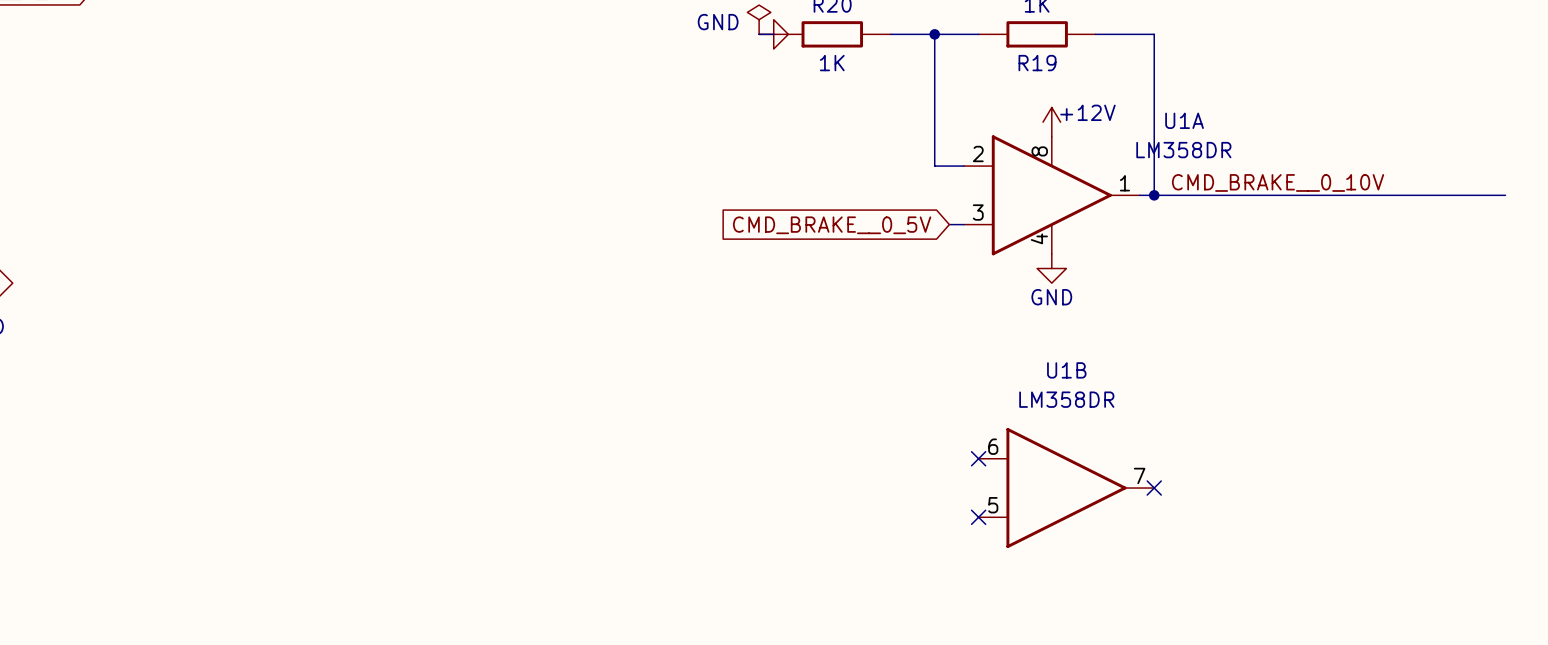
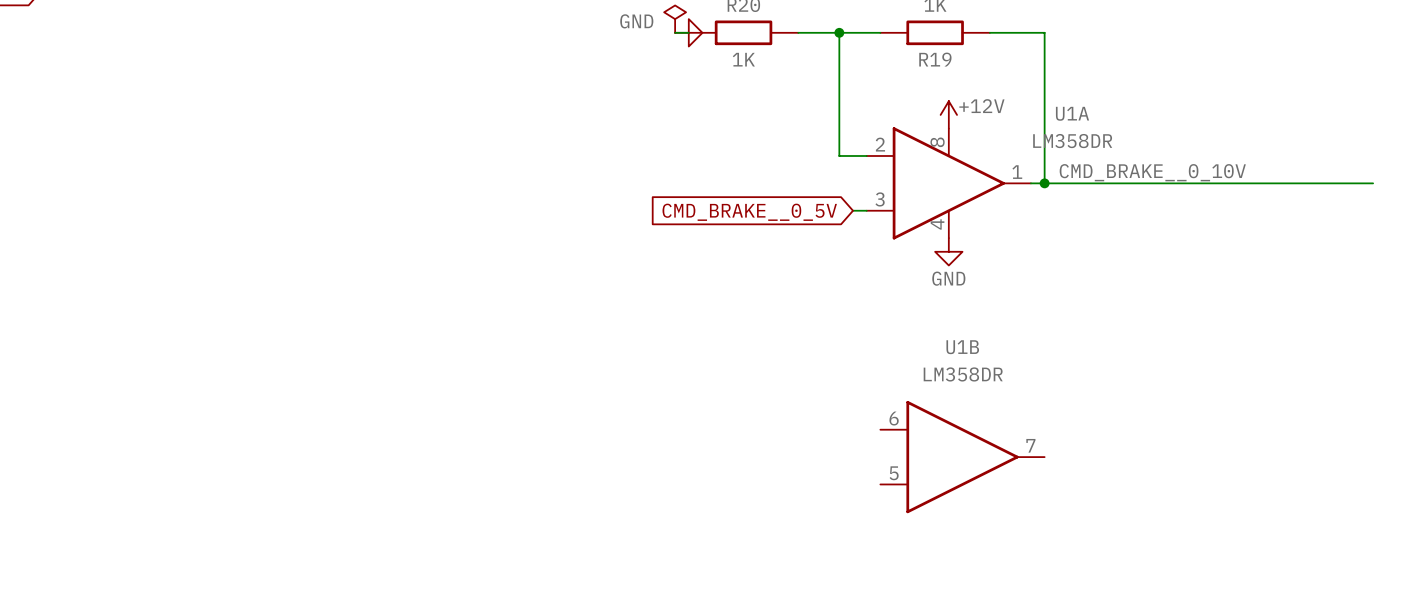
no-connect mark: (978, 458) -> none
no-connect mark: (1154, 488) -> none
no-connect mark: (978, 517) -> none

